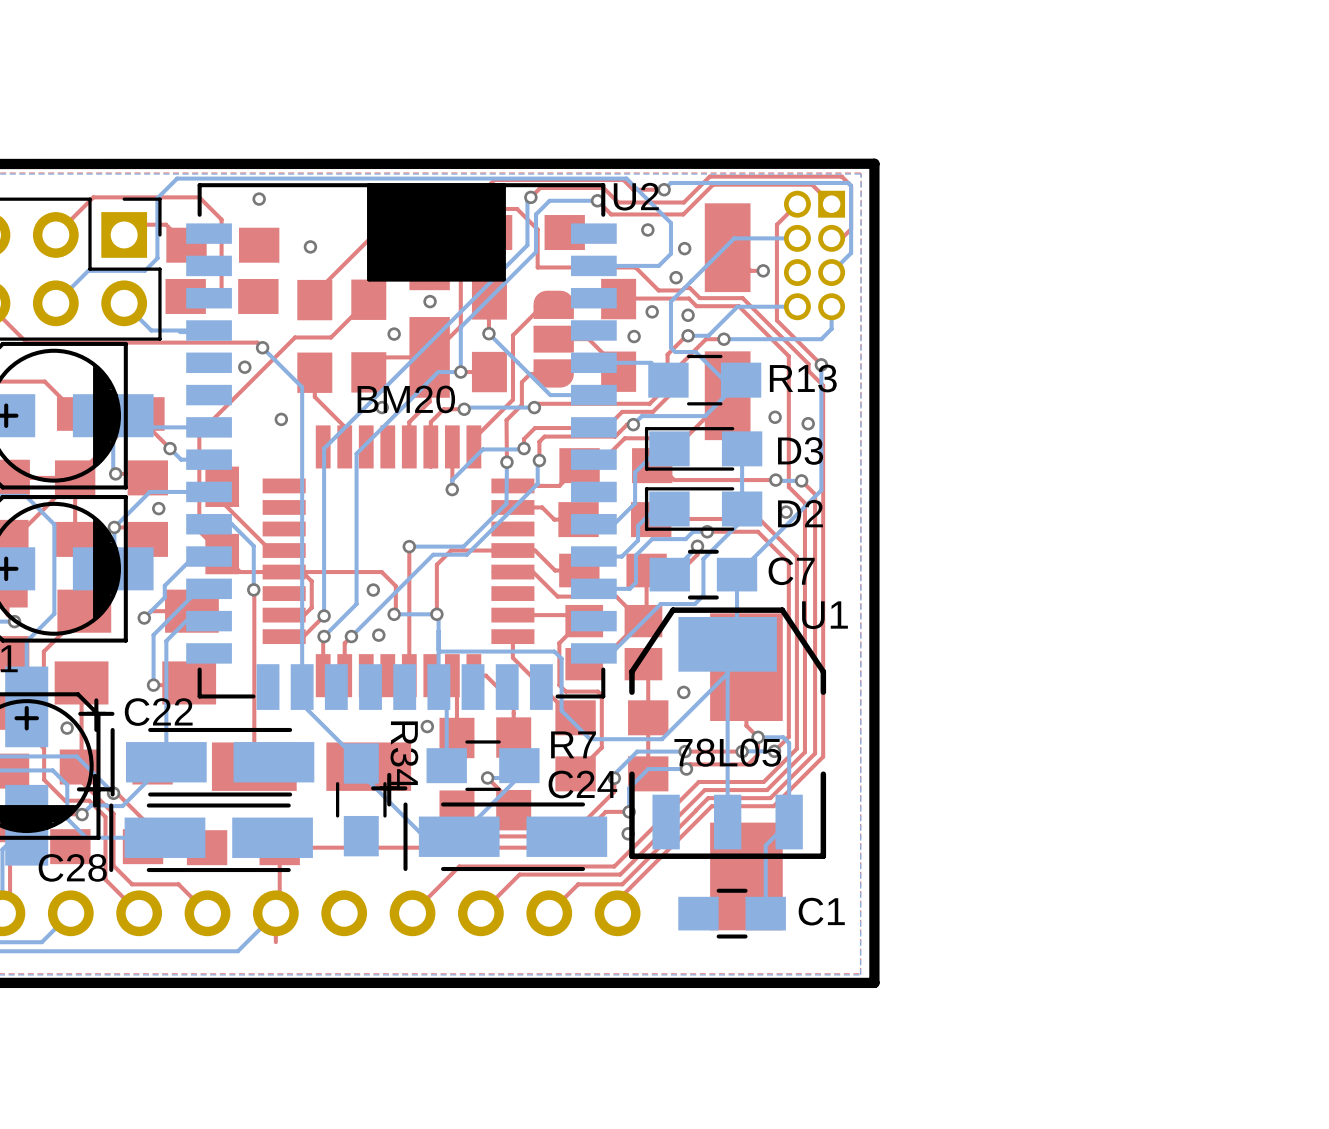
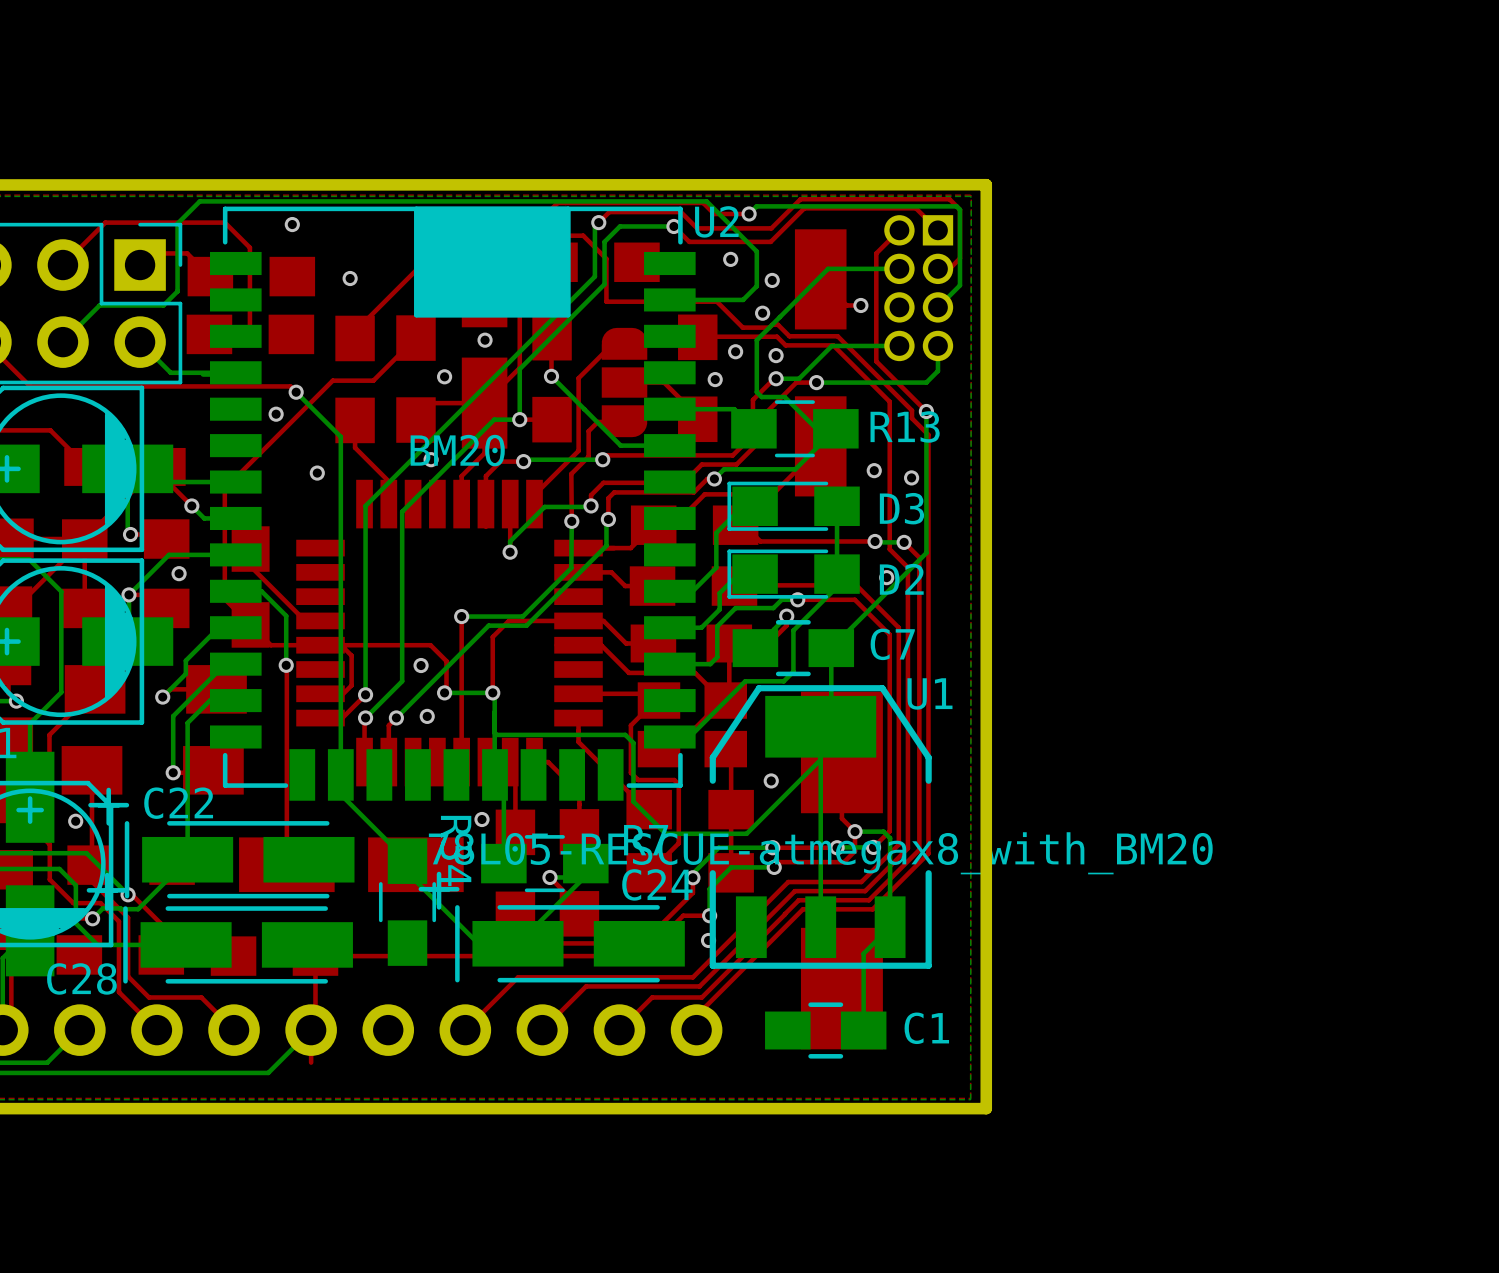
U1 value: 78L05 (727, 752) -> 78L05-RESCUE-atmegax8_with_BM20 (820, 853)

